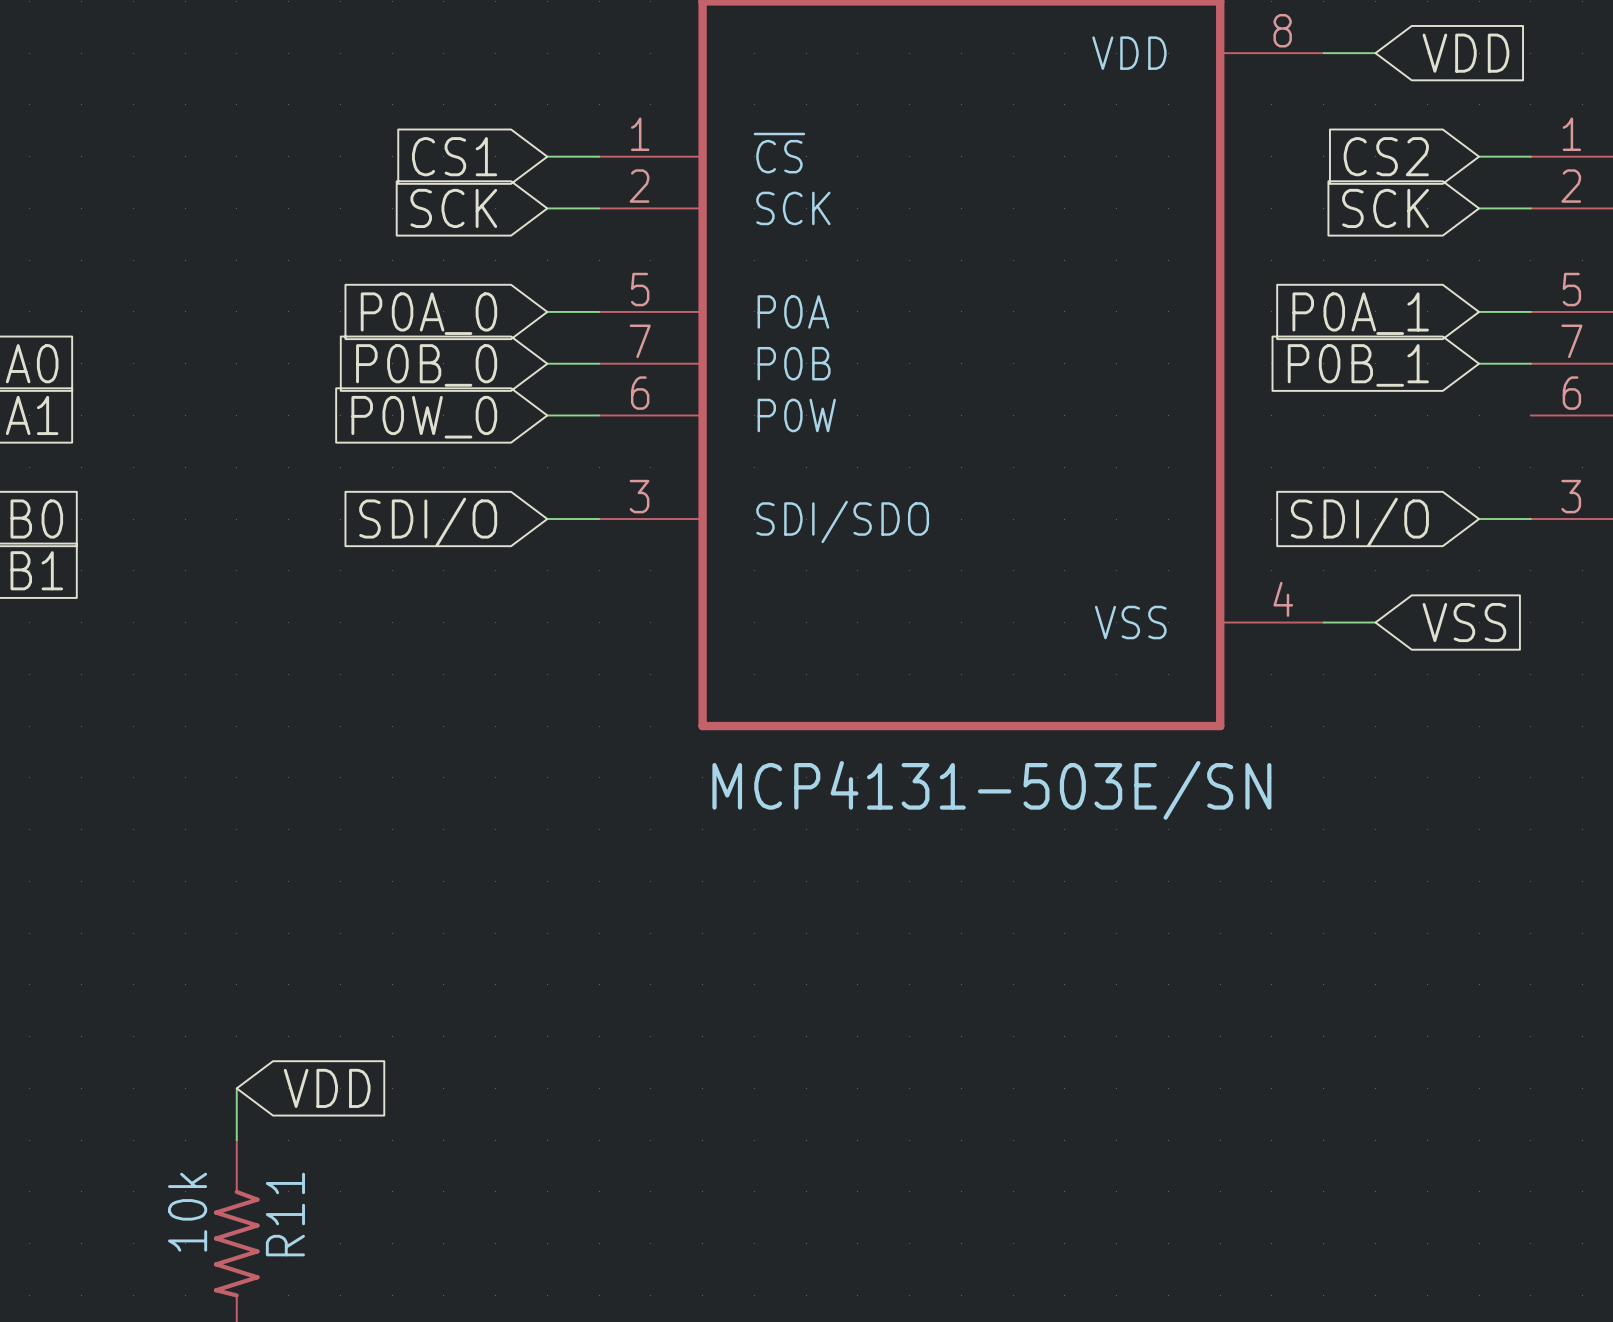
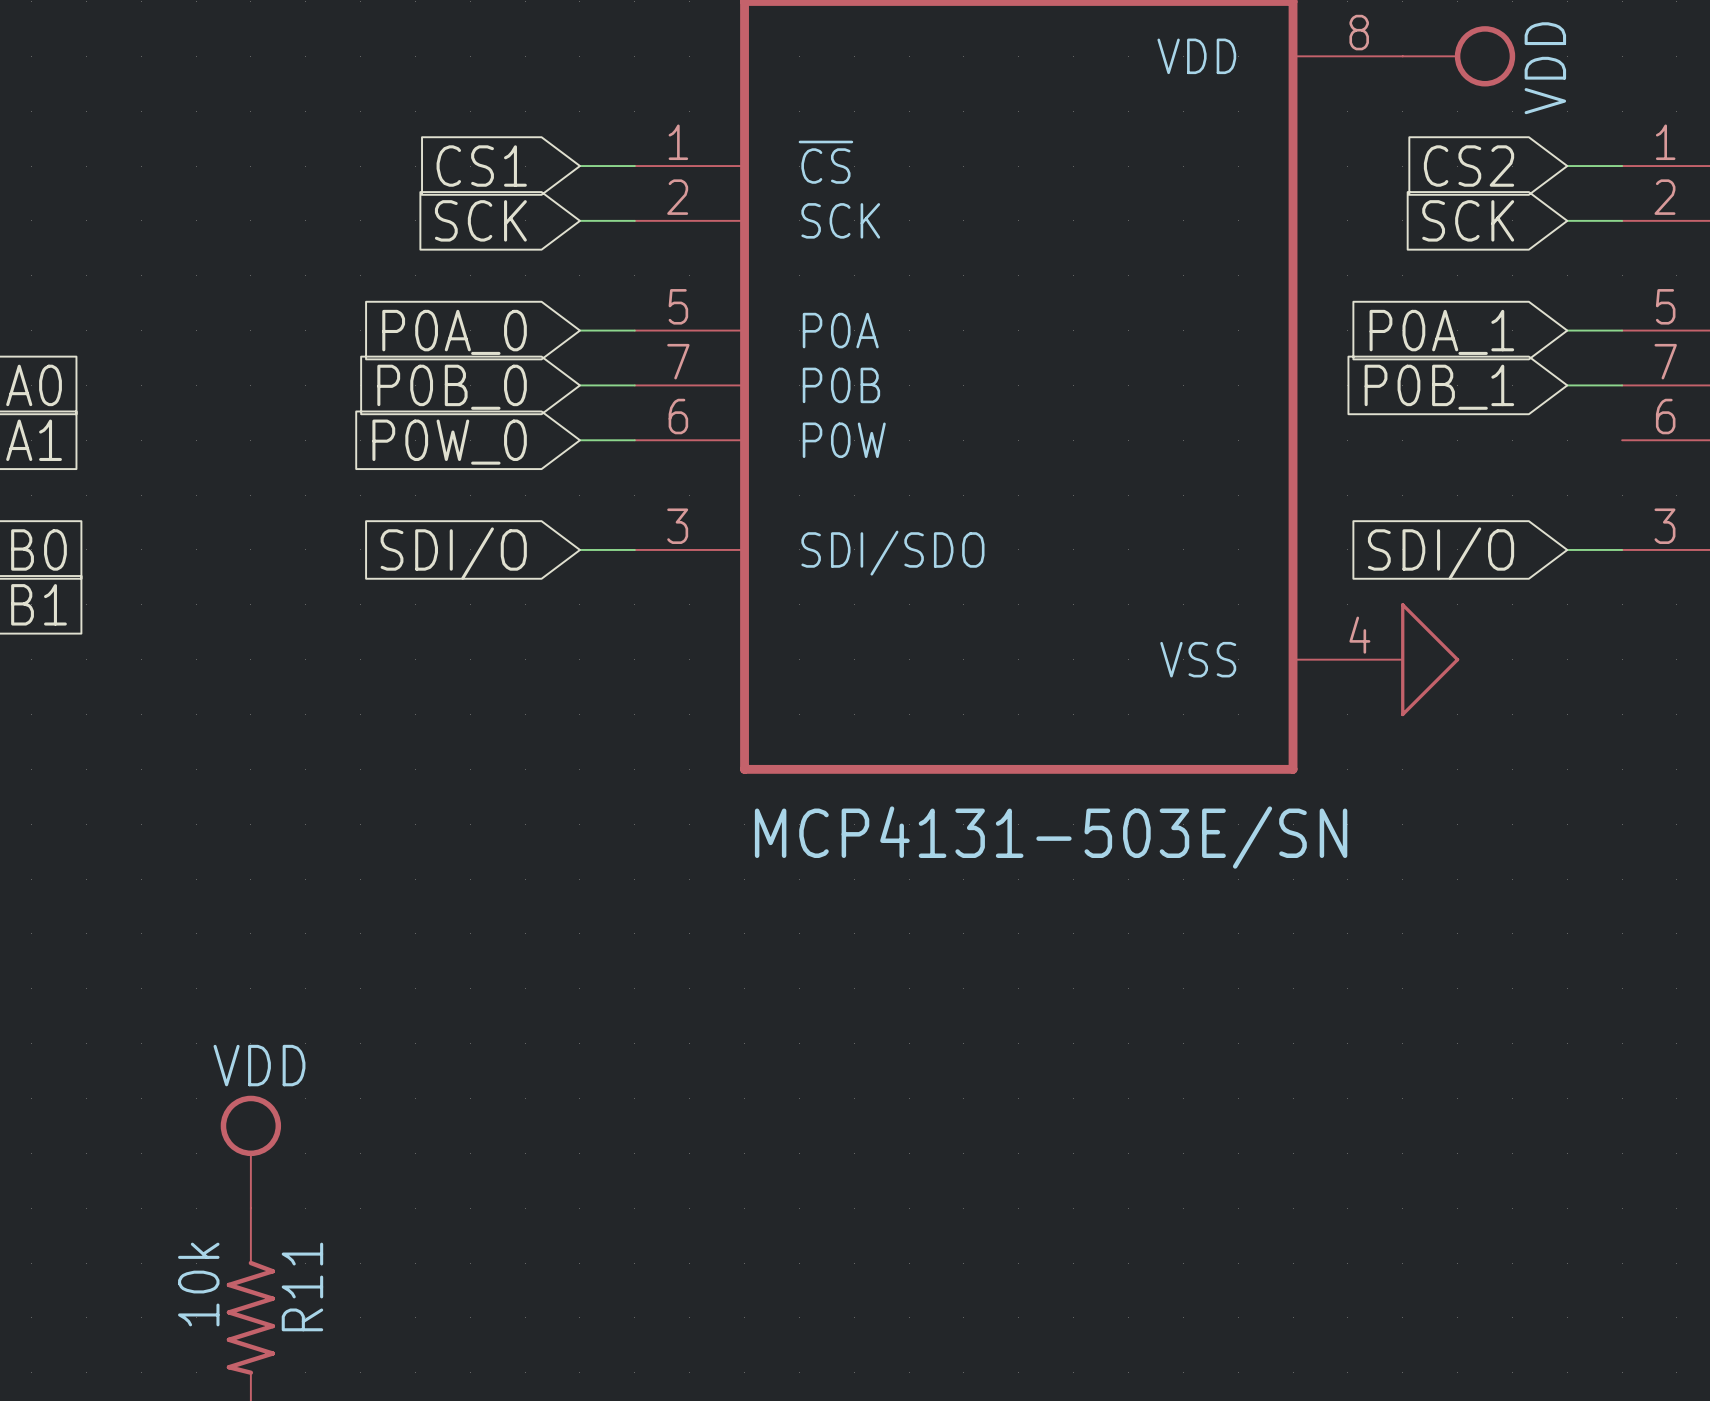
power symbol: none -> VDD (1458, 56)
global label: VDD (1465, 53) -> none
wire: (1323, 622) (1375, 622) -> none
power symbol: none -> (1430, 659)
global label: VSS (1464, 622) -> none
power symbol: none -> VDD (250, 1151)
global label: VDD (327, 1088) -> none

